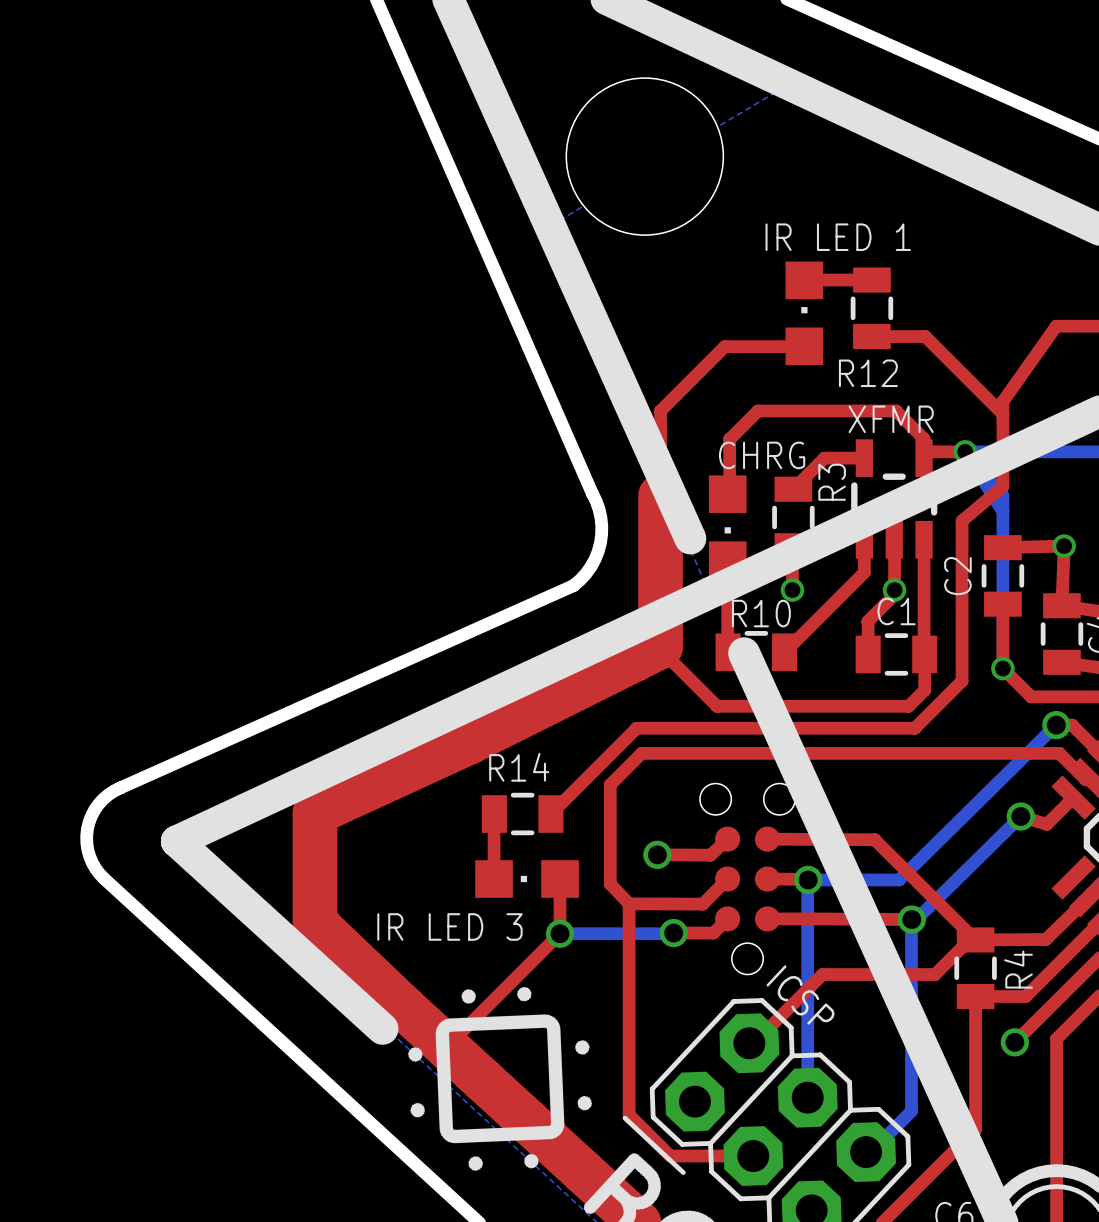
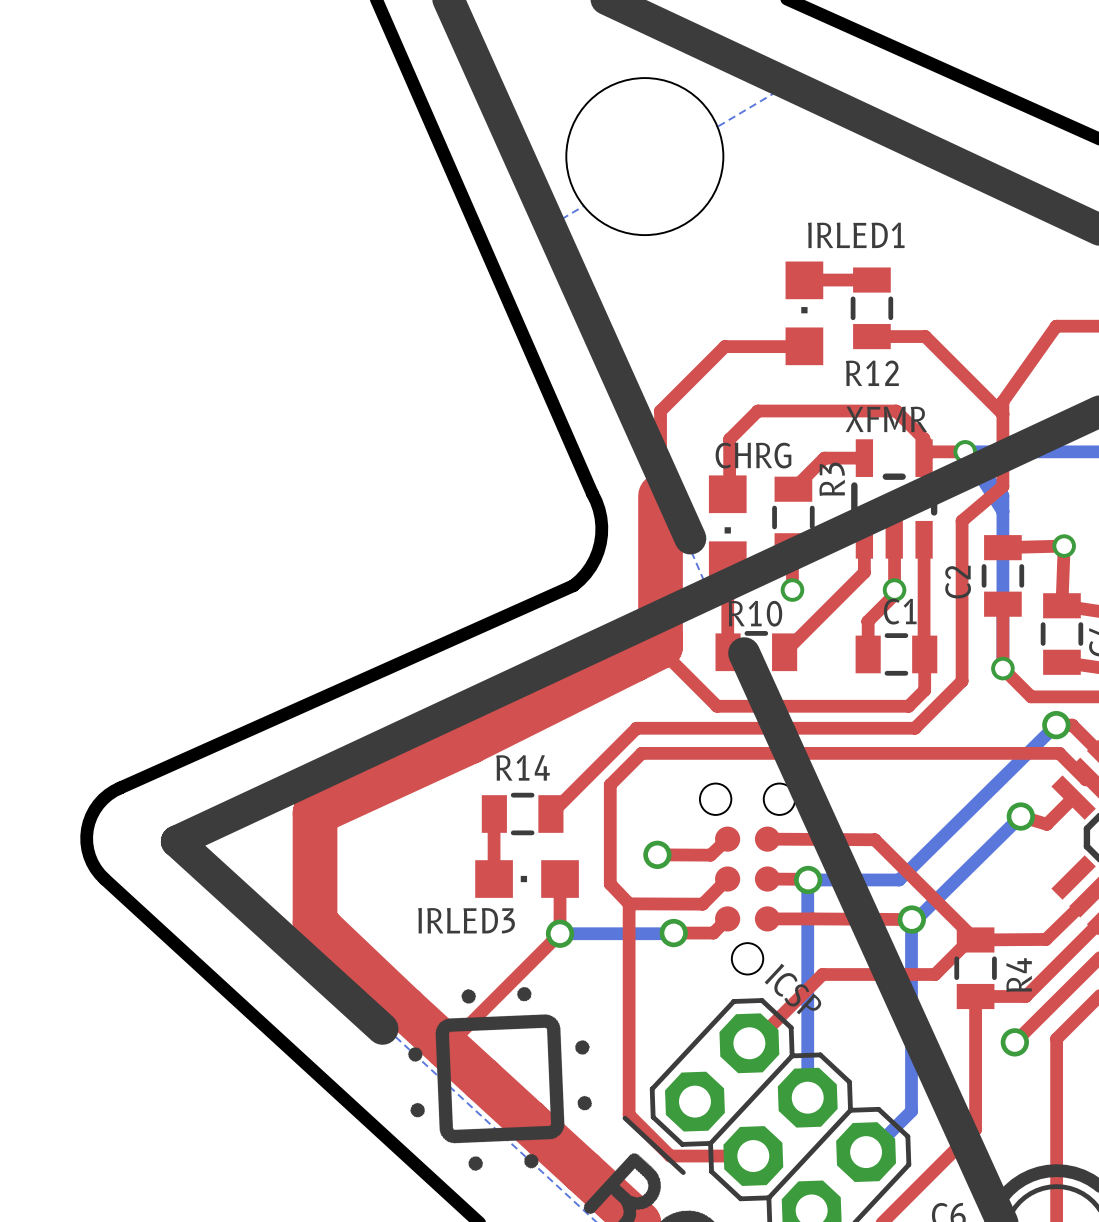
IRLED1 name: none -> IRLED1 (856, 235)
IRLED1 value: IR LED 1 (838, 237) -> none
IRLED3 name: none -> IRLED3 (466, 920)
IRLED3 value: IR LED 3 (449, 926) -> none

